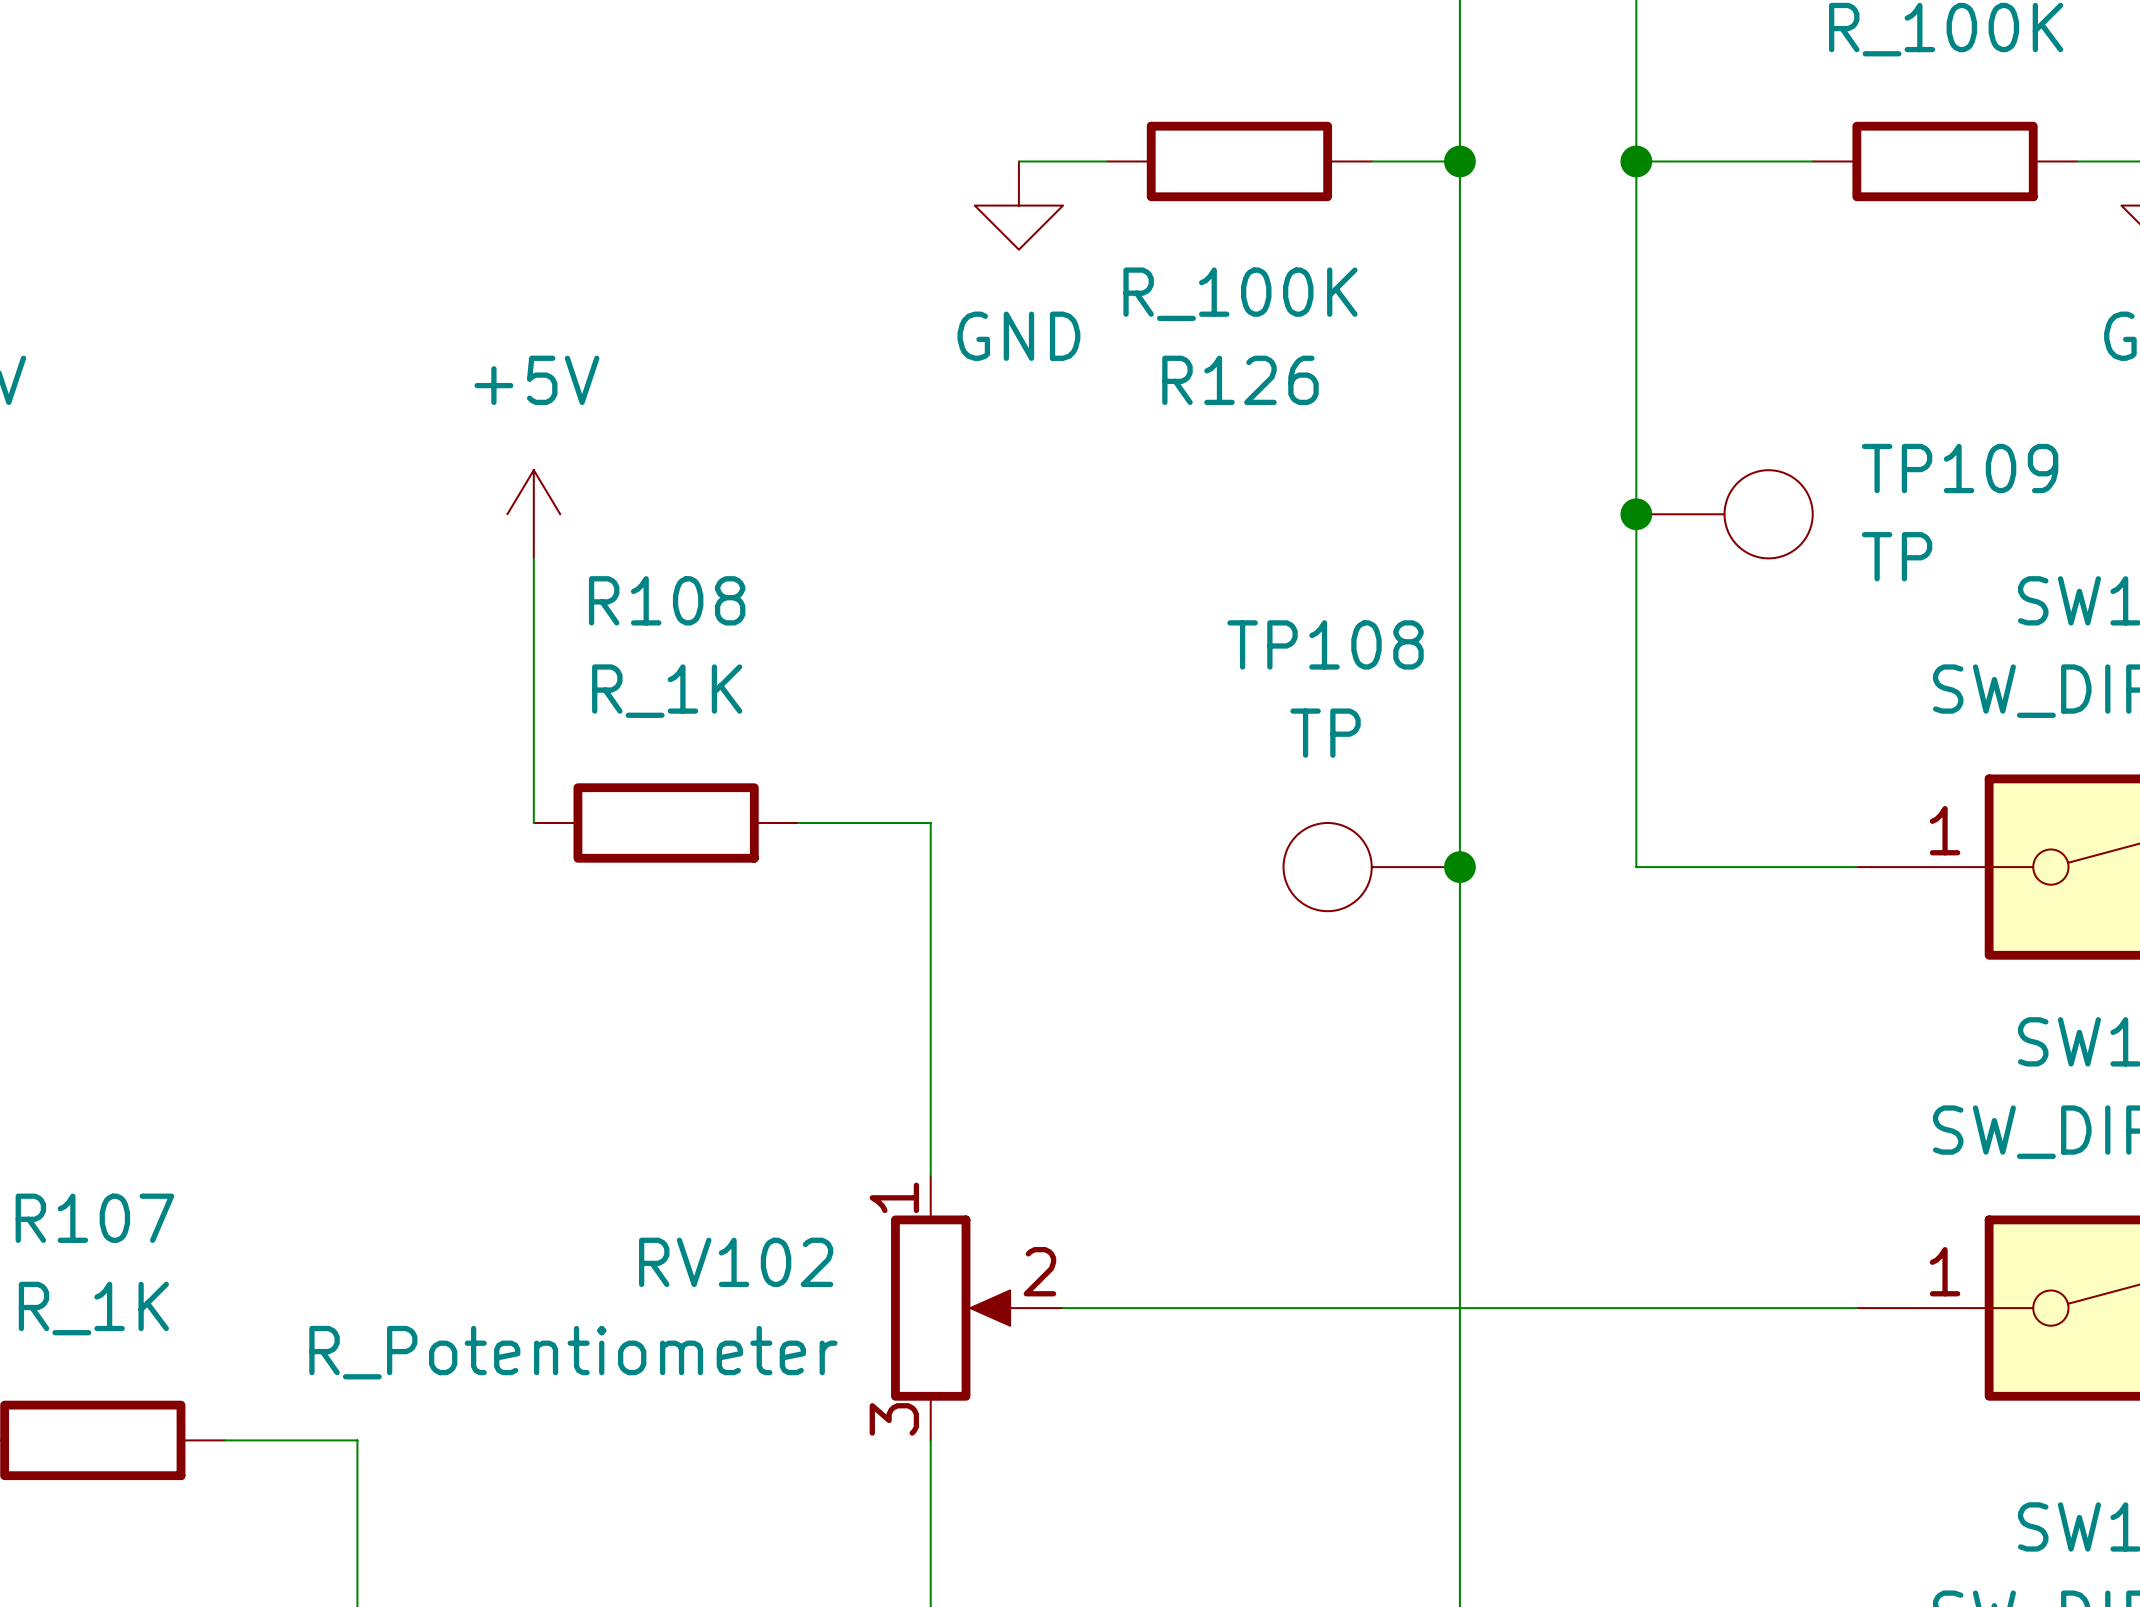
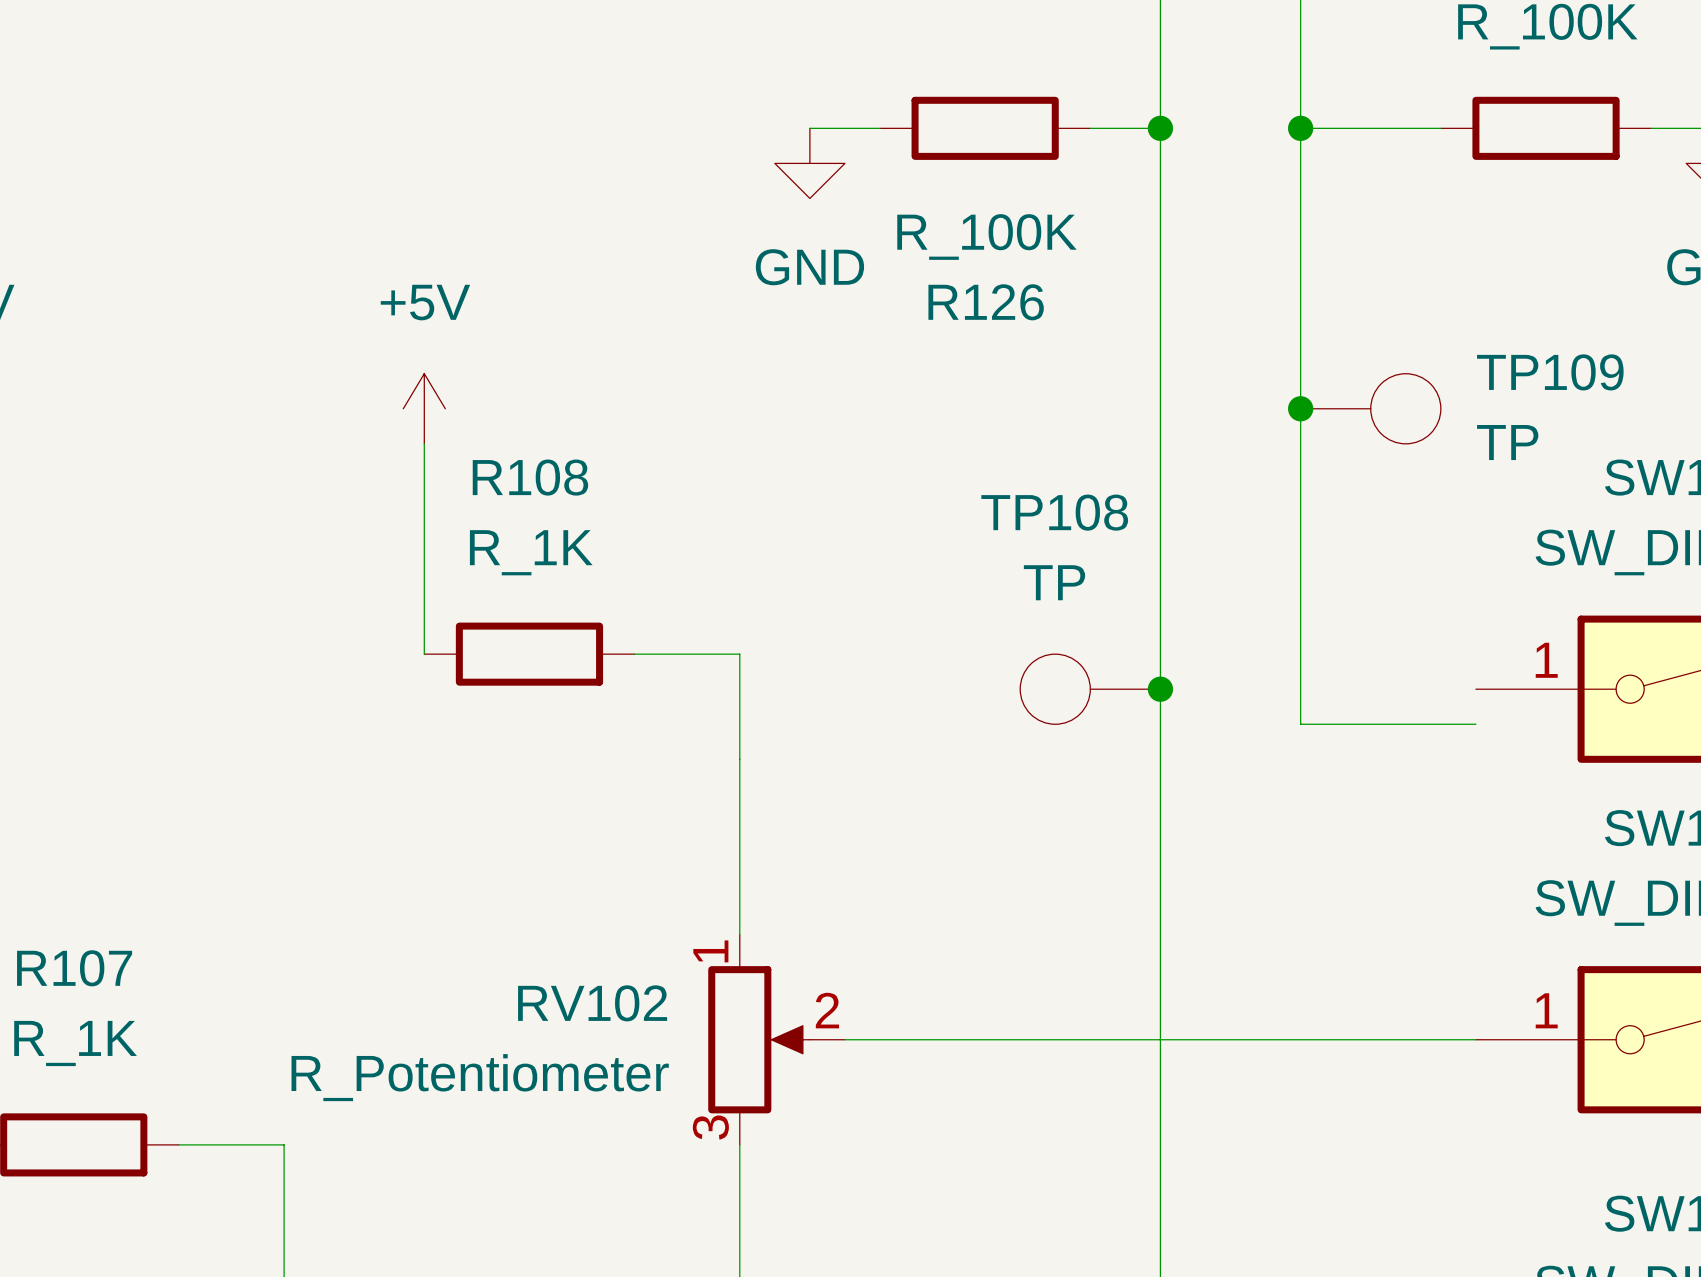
wire: (1636, 867) (1856, 867) -> (1300, 689) (1300, 724) (1475, 724)

